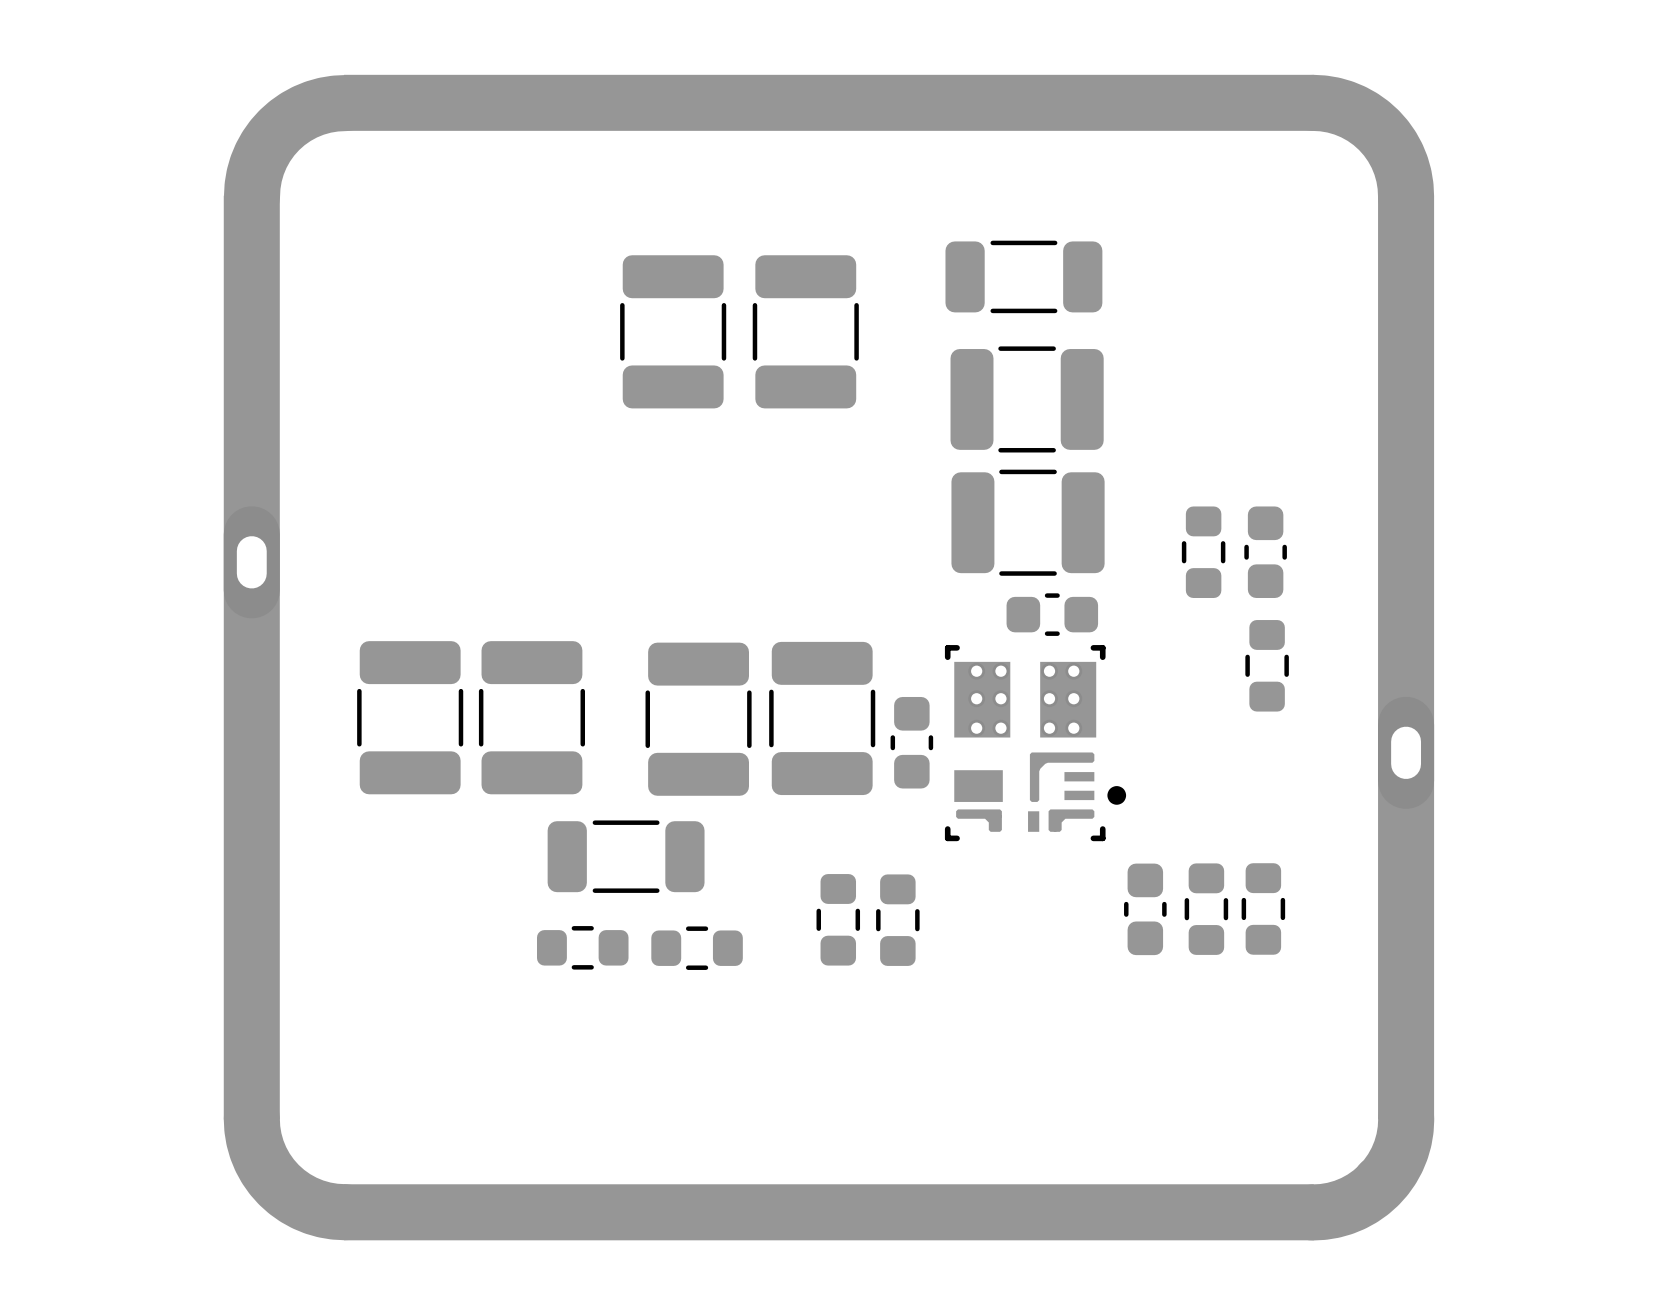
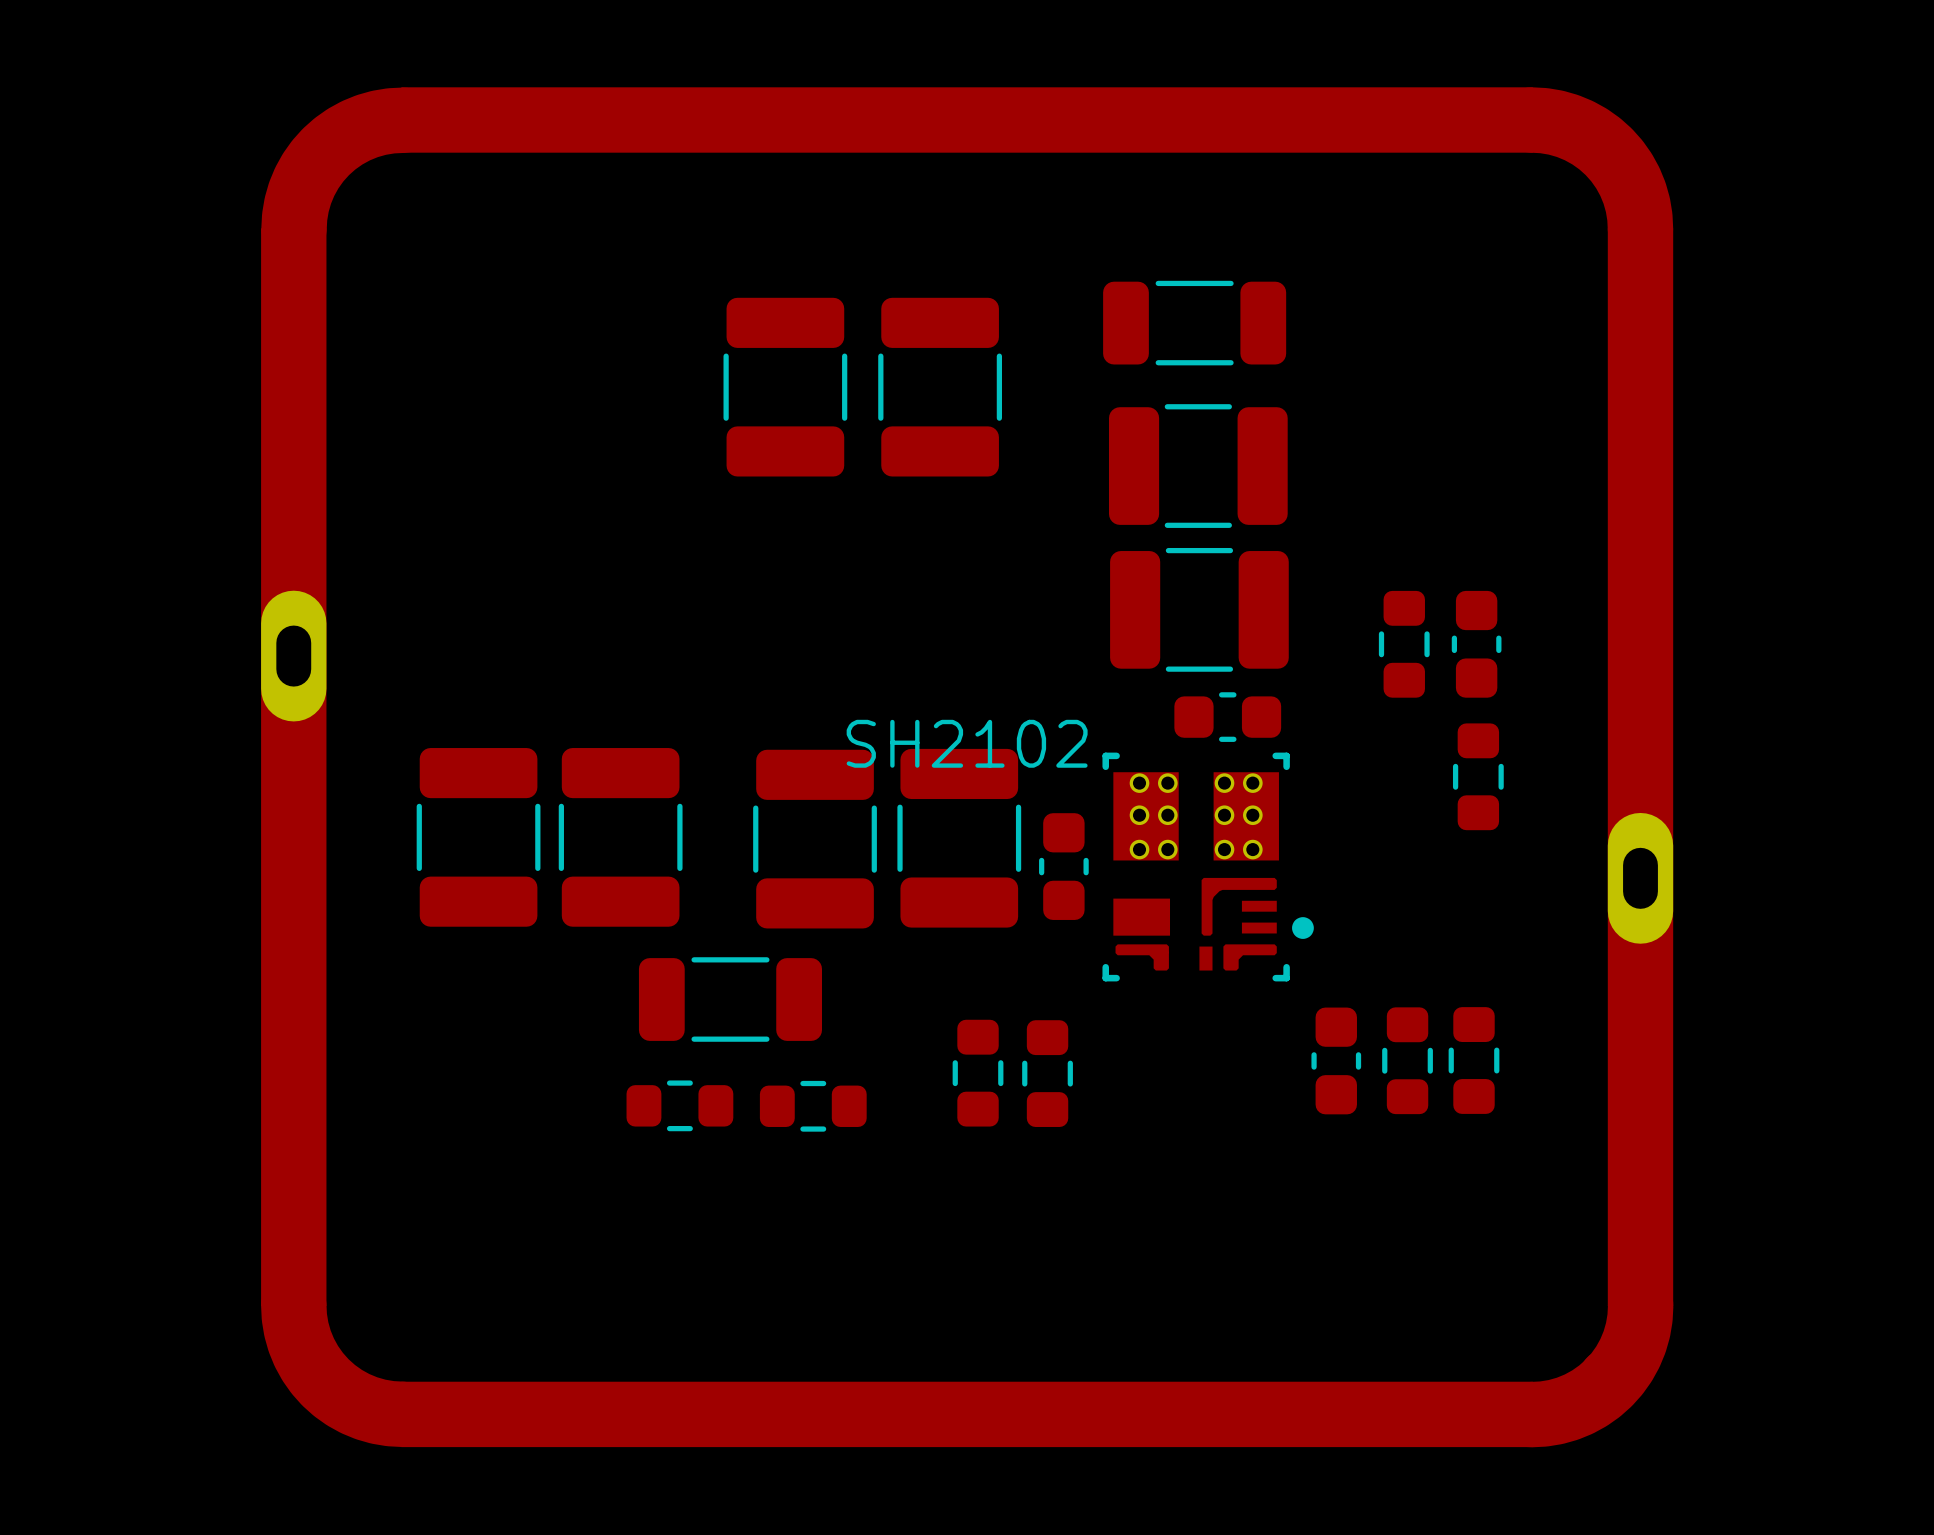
SH2102 name: none -> SH2102 (967, 743)

